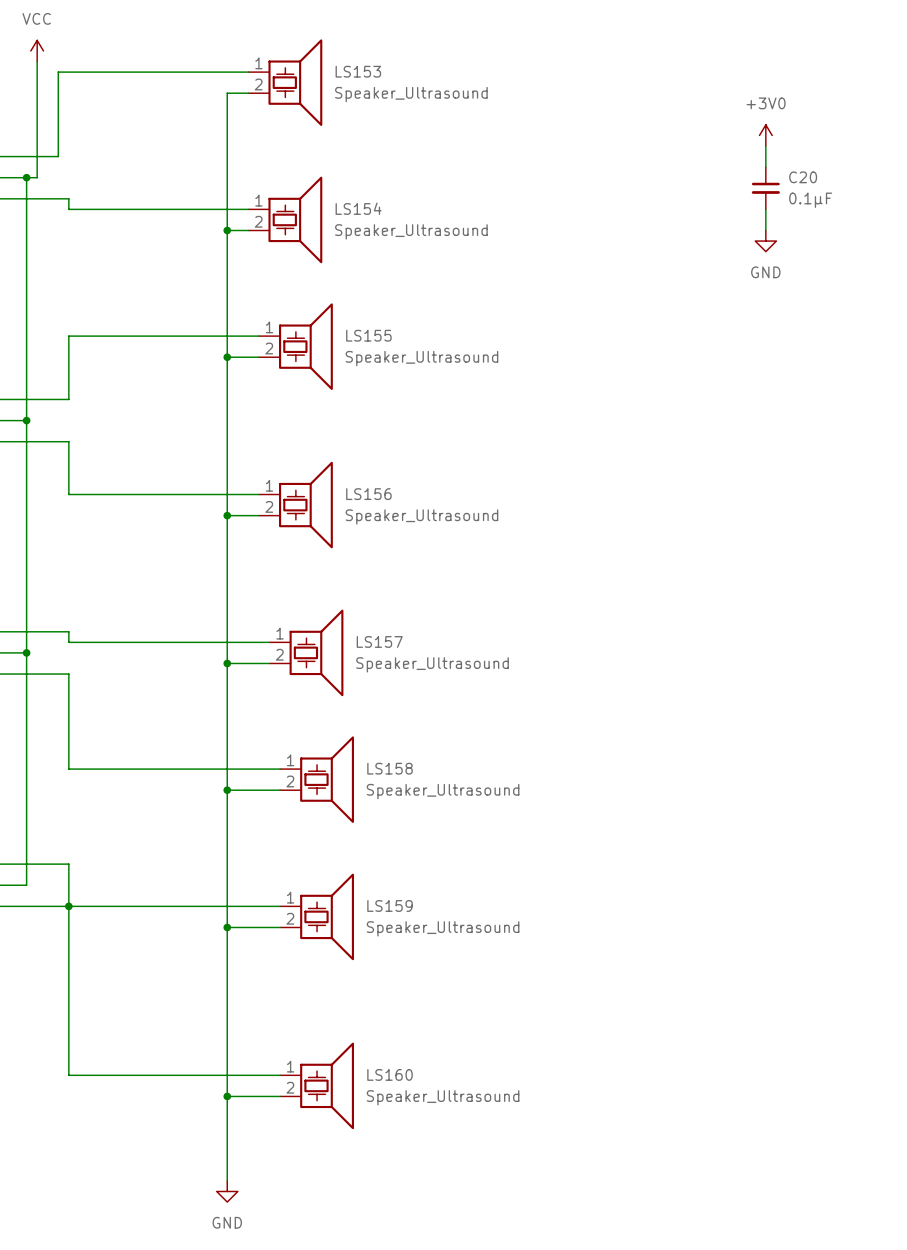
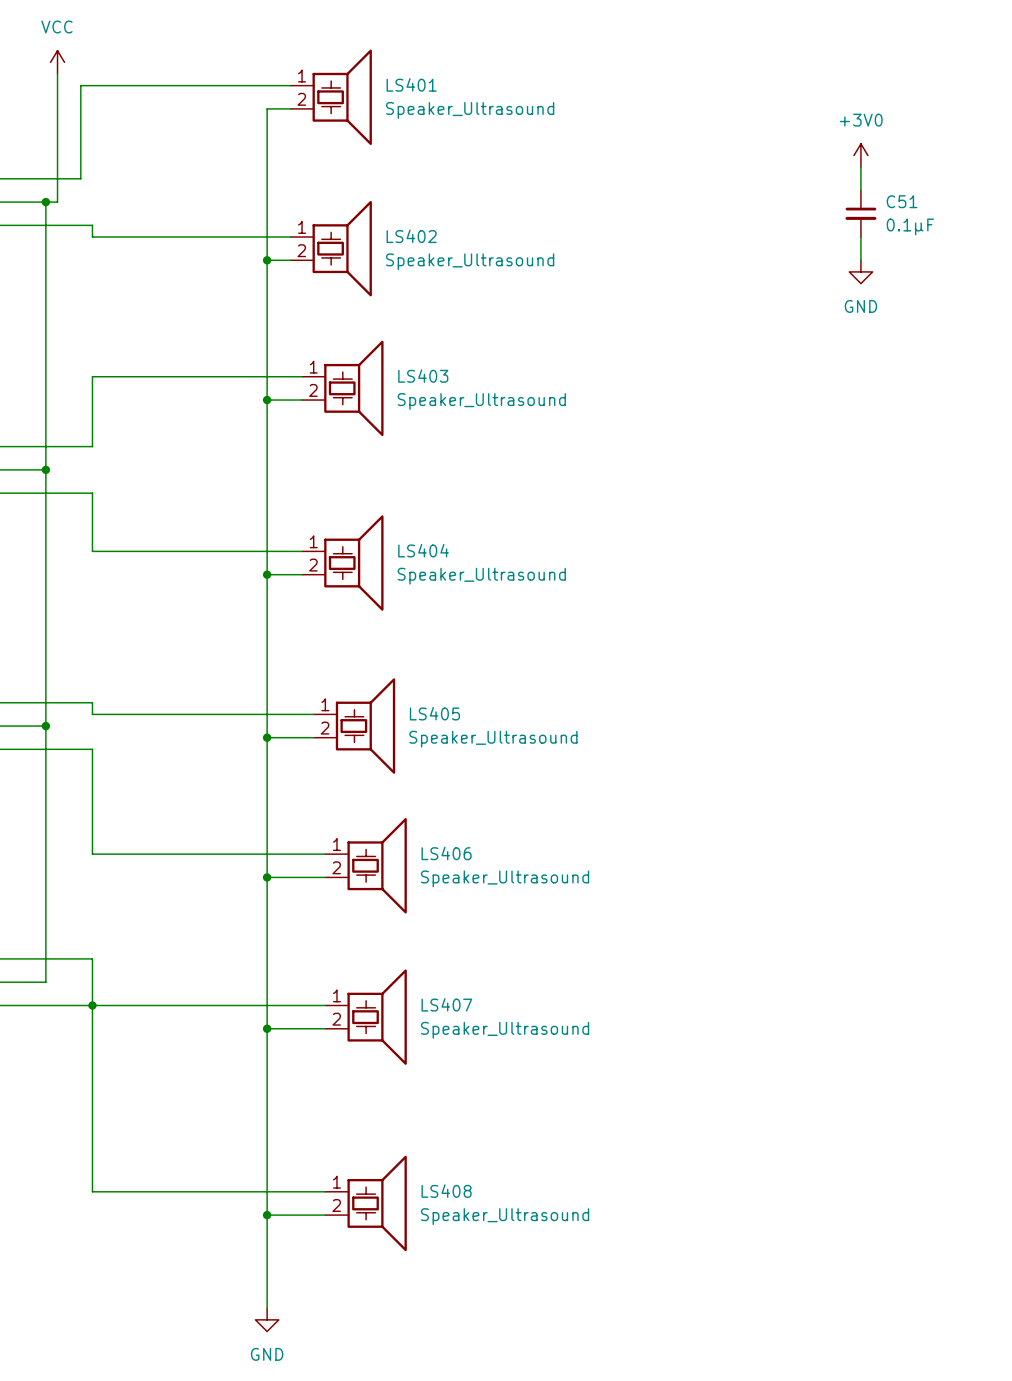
LS153 name: LS153 (358, 71) -> LS401 (411, 84)
C20 name: C20 (803, 177) -> C51 (902, 201)
LS154 name: LS154 (358, 208) -> LS402 (411, 236)
LS155 name: LS155 (368, 335) -> LS403 (423, 376)
LS156 name: LS156 (368, 494) -> LS404 (423, 550)
LS157 name: LS157 (379, 641) -> LS405 (434, 713)
LS158 name: LS158 (390, 768) -> LS406 (446, 853)
LS159 name: LS159 (390, 905) -> LS407 (446, 1004)
LS160 name: LS160 (390, 1074) -> LS408 (446, 1191)

